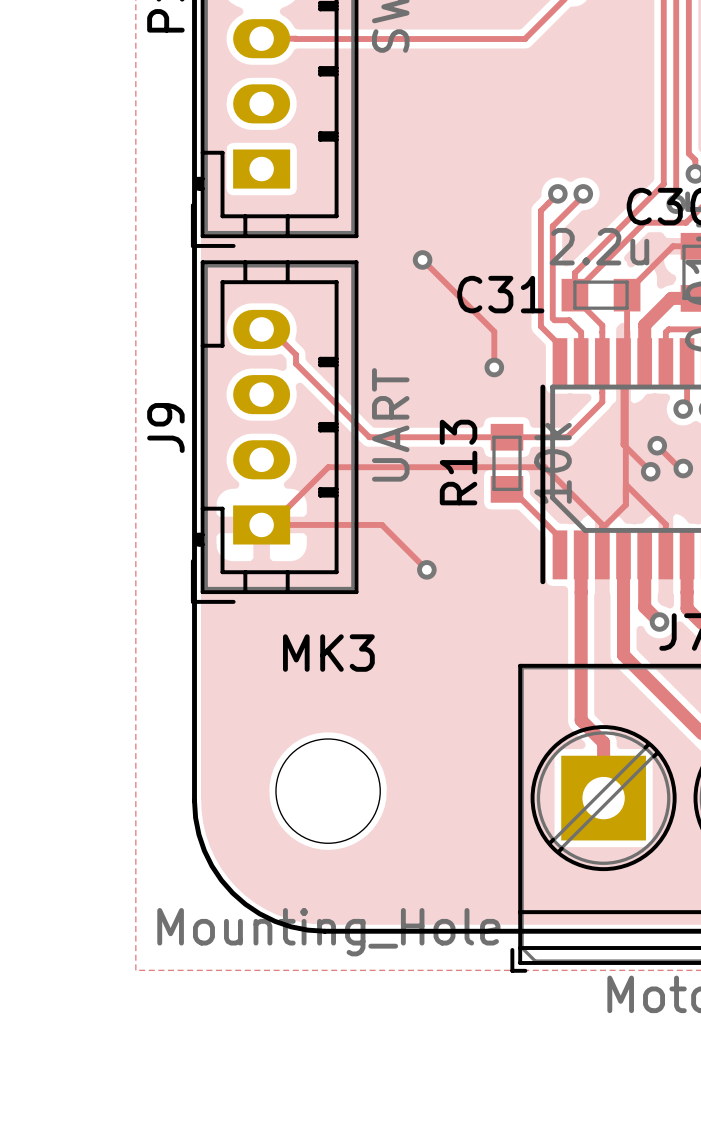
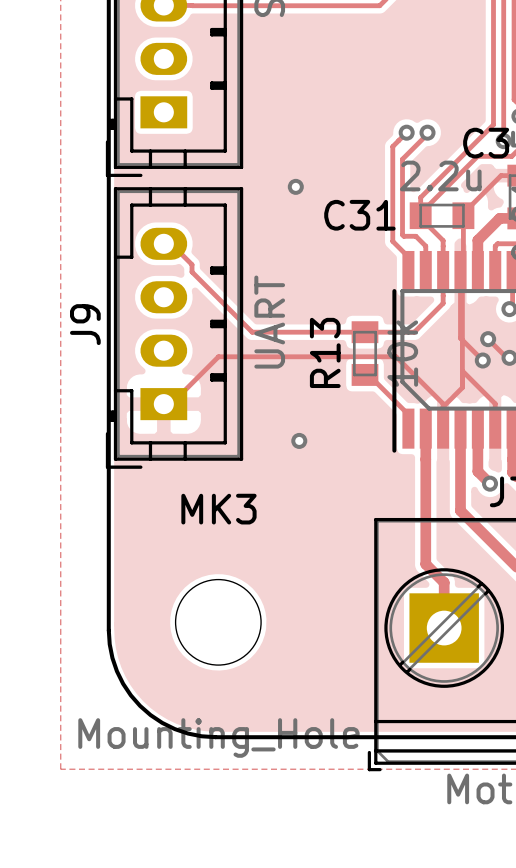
track: (422, 259) (494, 331) (494, 367) -> none
via: (494, 367) -> none
track: (270, 524) (381, 524) (426, 569) -> none

